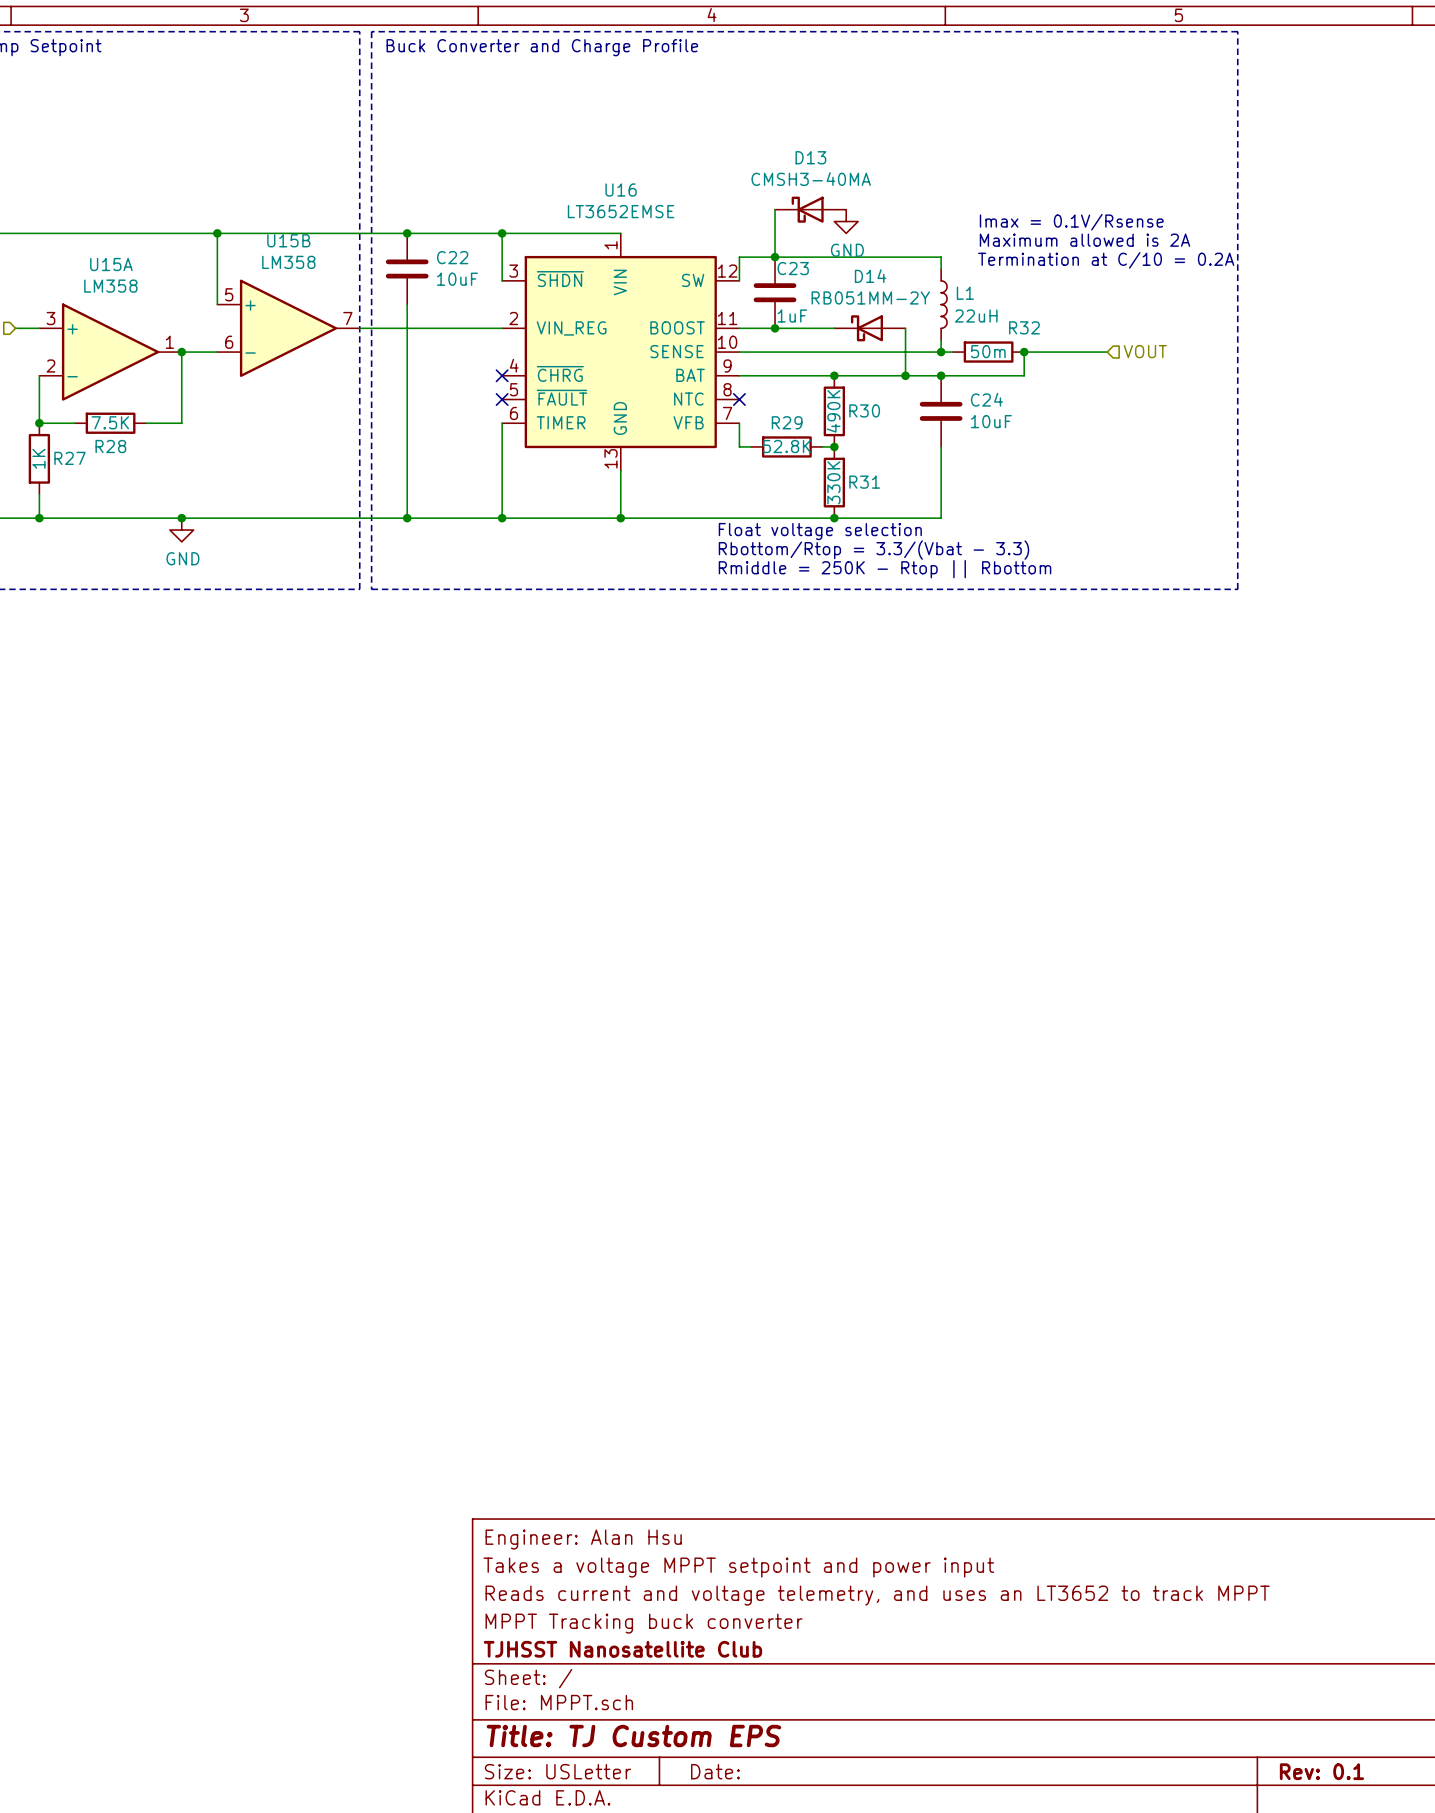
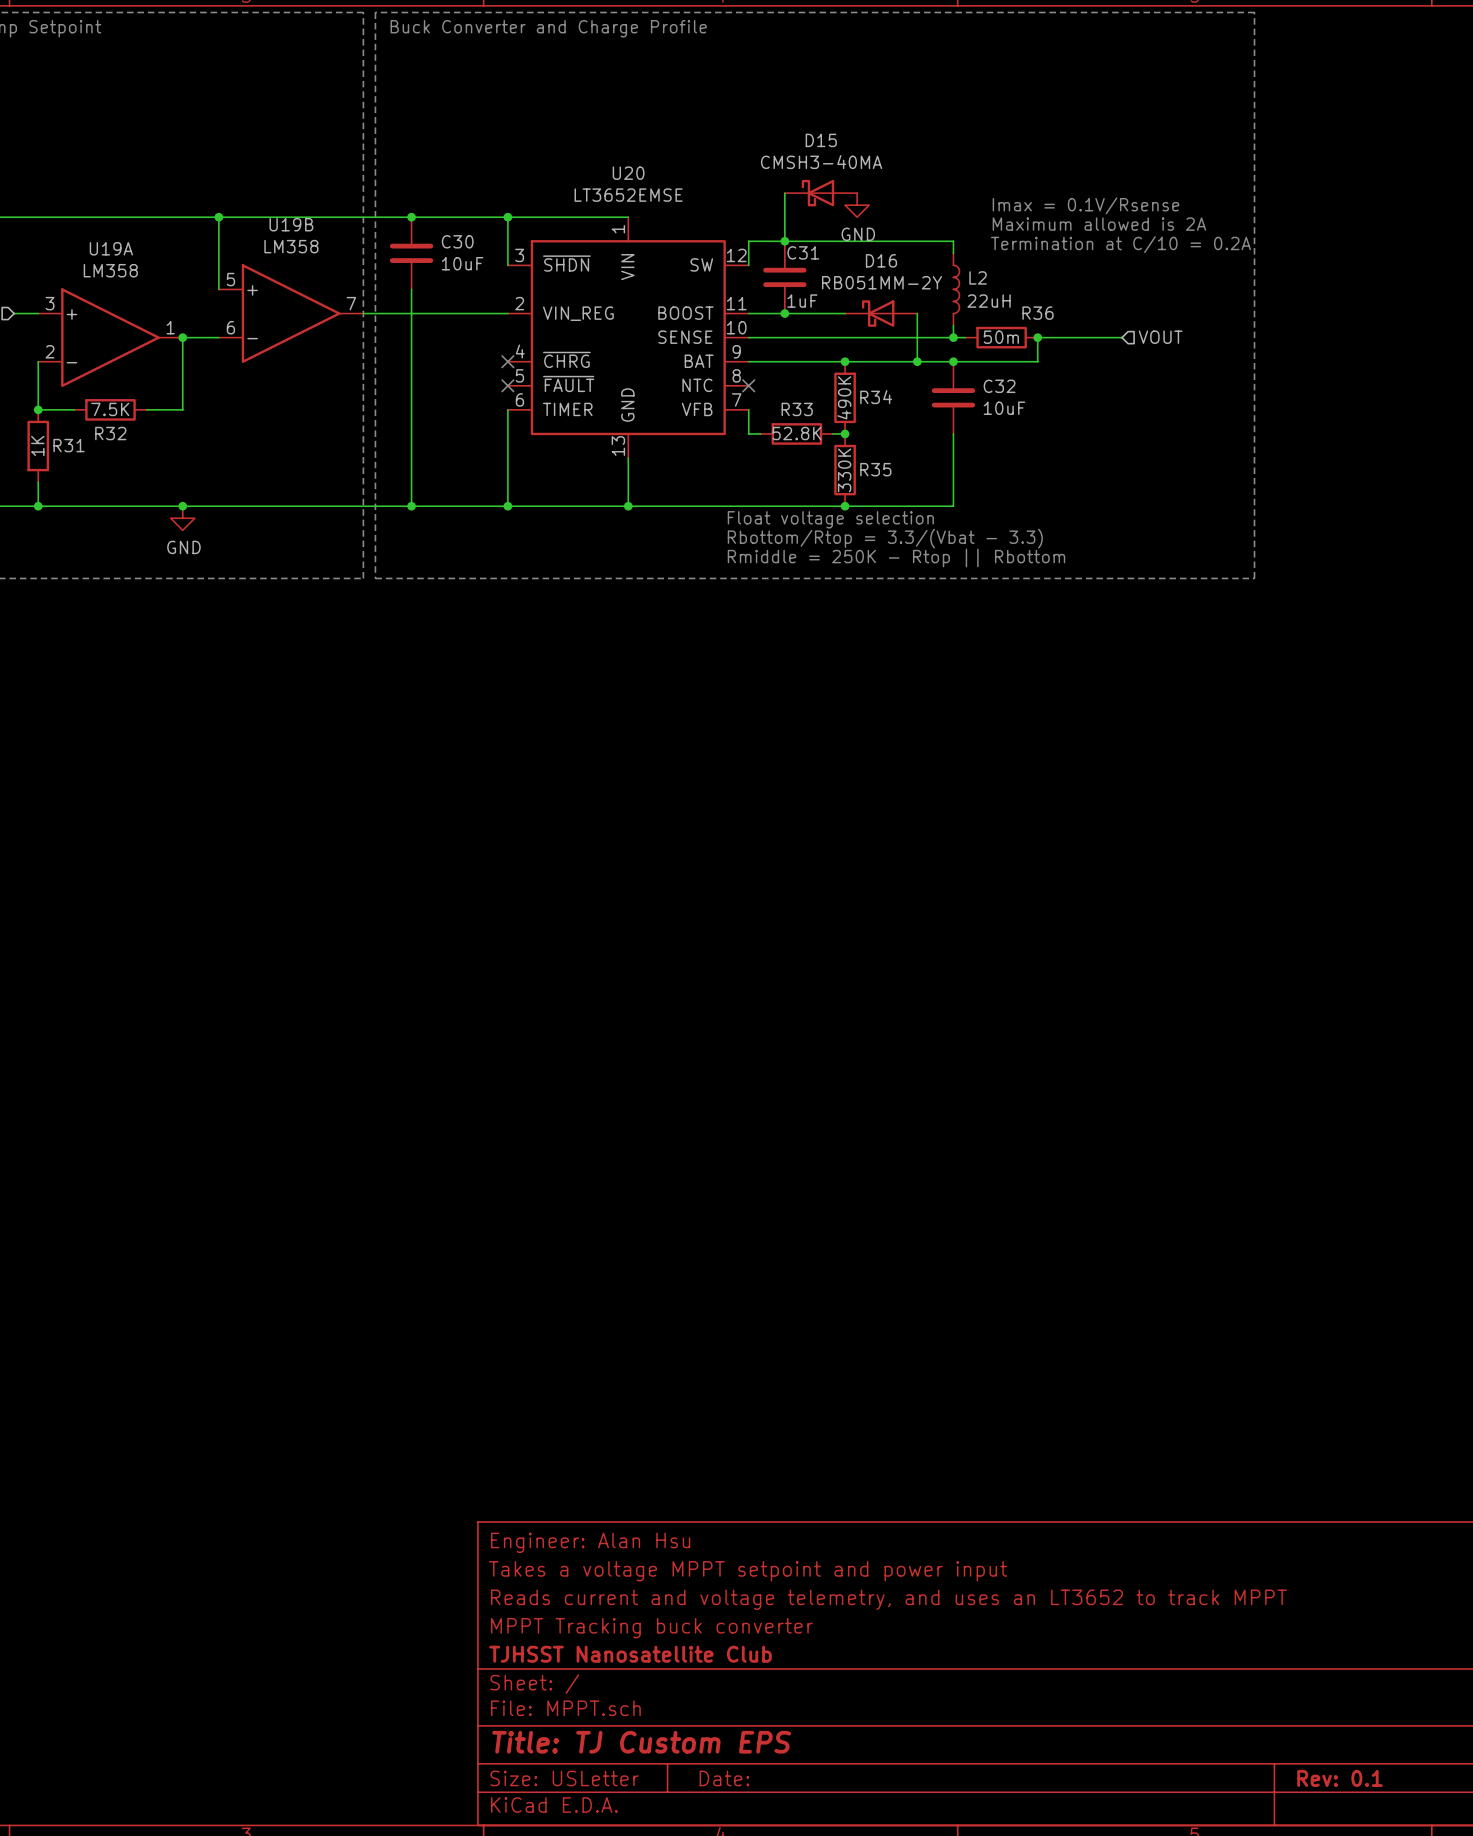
D13 name: D13 (810, 157) -> D15 (821, 140)
U16 name: U16 (621, 190) -> U20 (628, 173)
U15B name: U15B (288, 240) -> U19B (291, 224)
C22 name: C22 (452, 257) -> C30 (457, 241)
U15A name: U15A (111, 264) -> U19A (111, 248)
C23 name: C23 (793, 268) -> C31 (803, 252)
D14 name: D14 (870, 276) -> D16 (881, 260)
L1 name: L1 (965, 293) -> L2 (978, 277)
R32 name: R32 (1024, 327) -> R36 (1038, 313)
C24 name: C24 (986, 399) -> C32 (999, 386)
R30 name: R30 (864, 410) -> R34 (876, 397)
R29 name: R29 (787, 422) -> R33 (797, 409)
R28 name: R28 (110, 446) -> R32 (110, 433)
R27 name: R27 (69, 458) -> R31 (69, 445)
R31 name: R31 (864, 482) -> R35 (875, 469)

